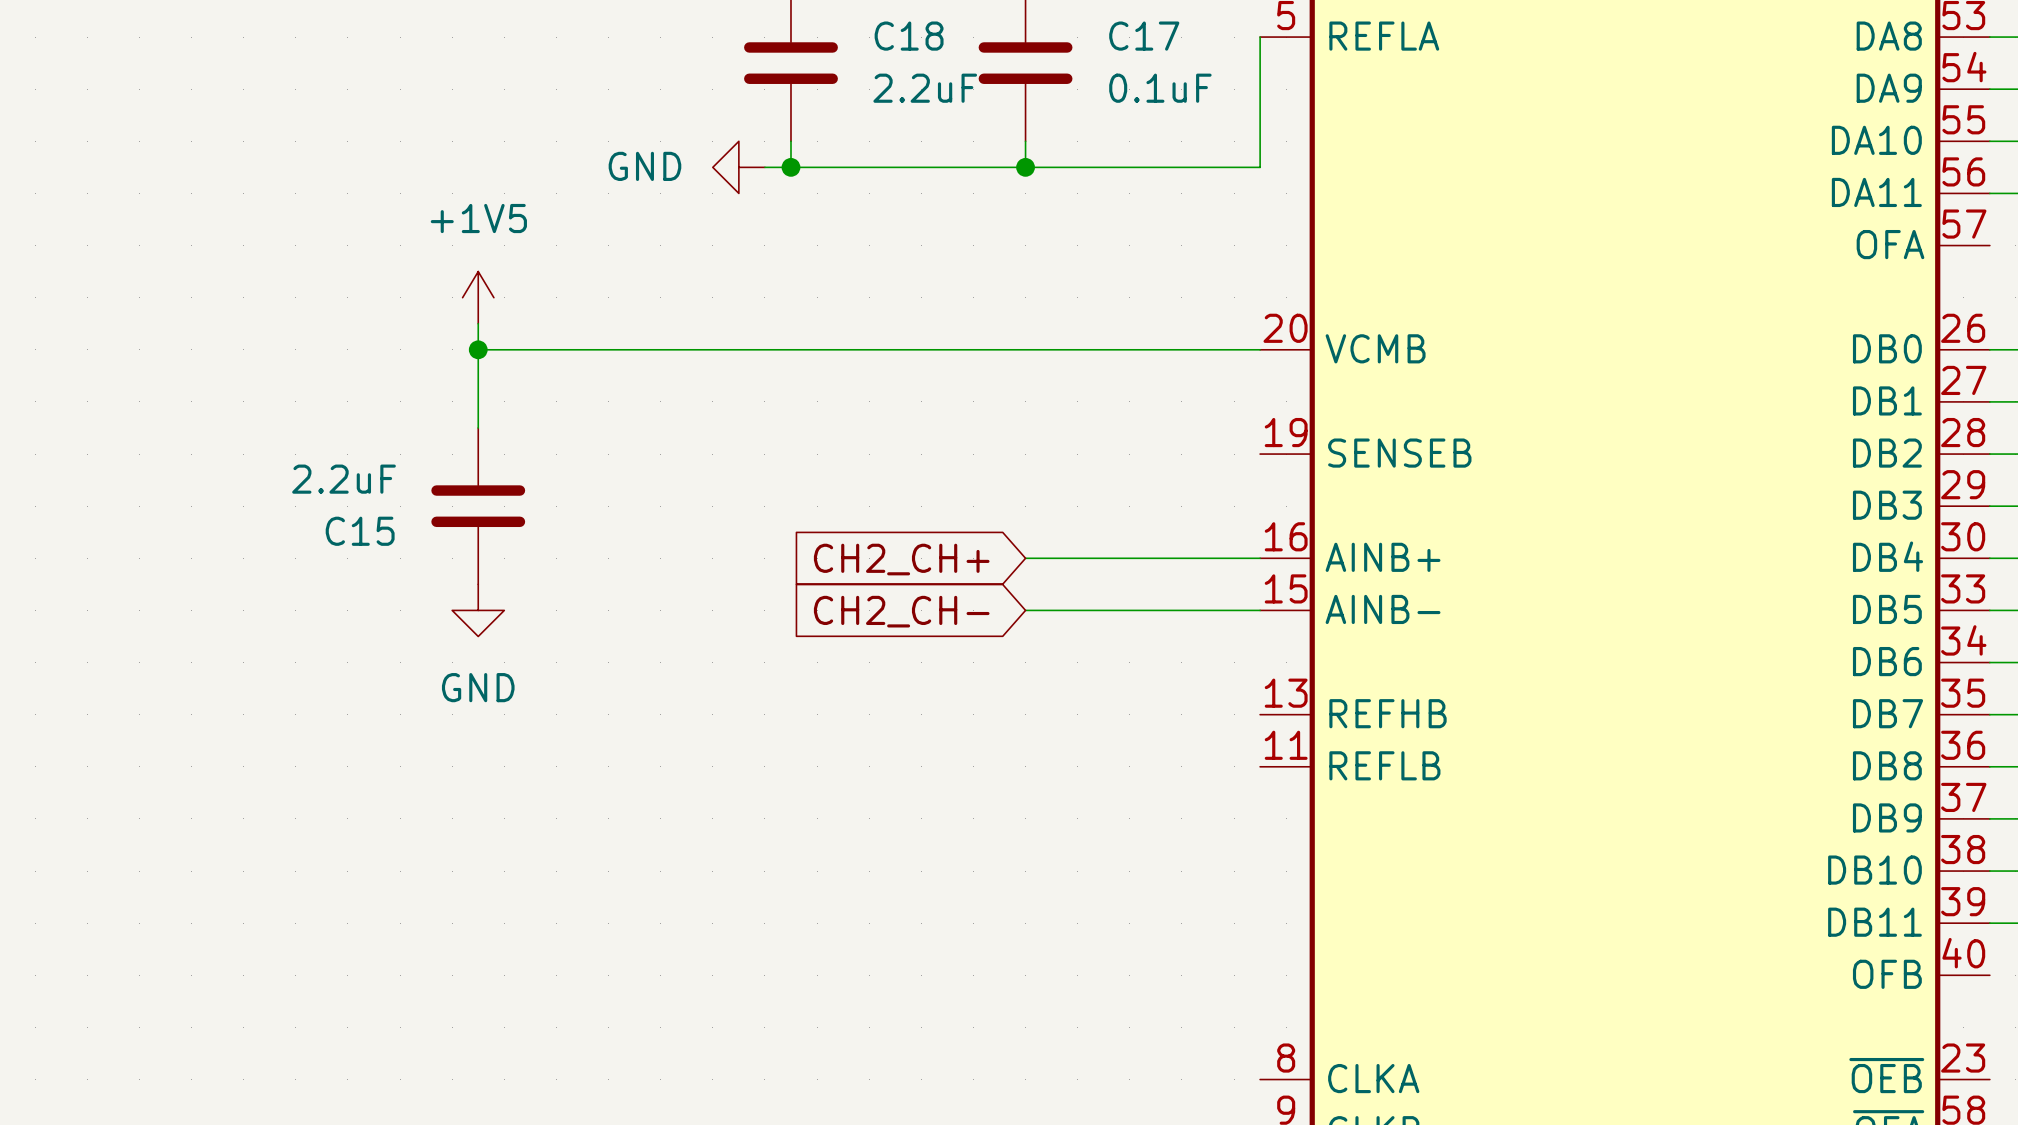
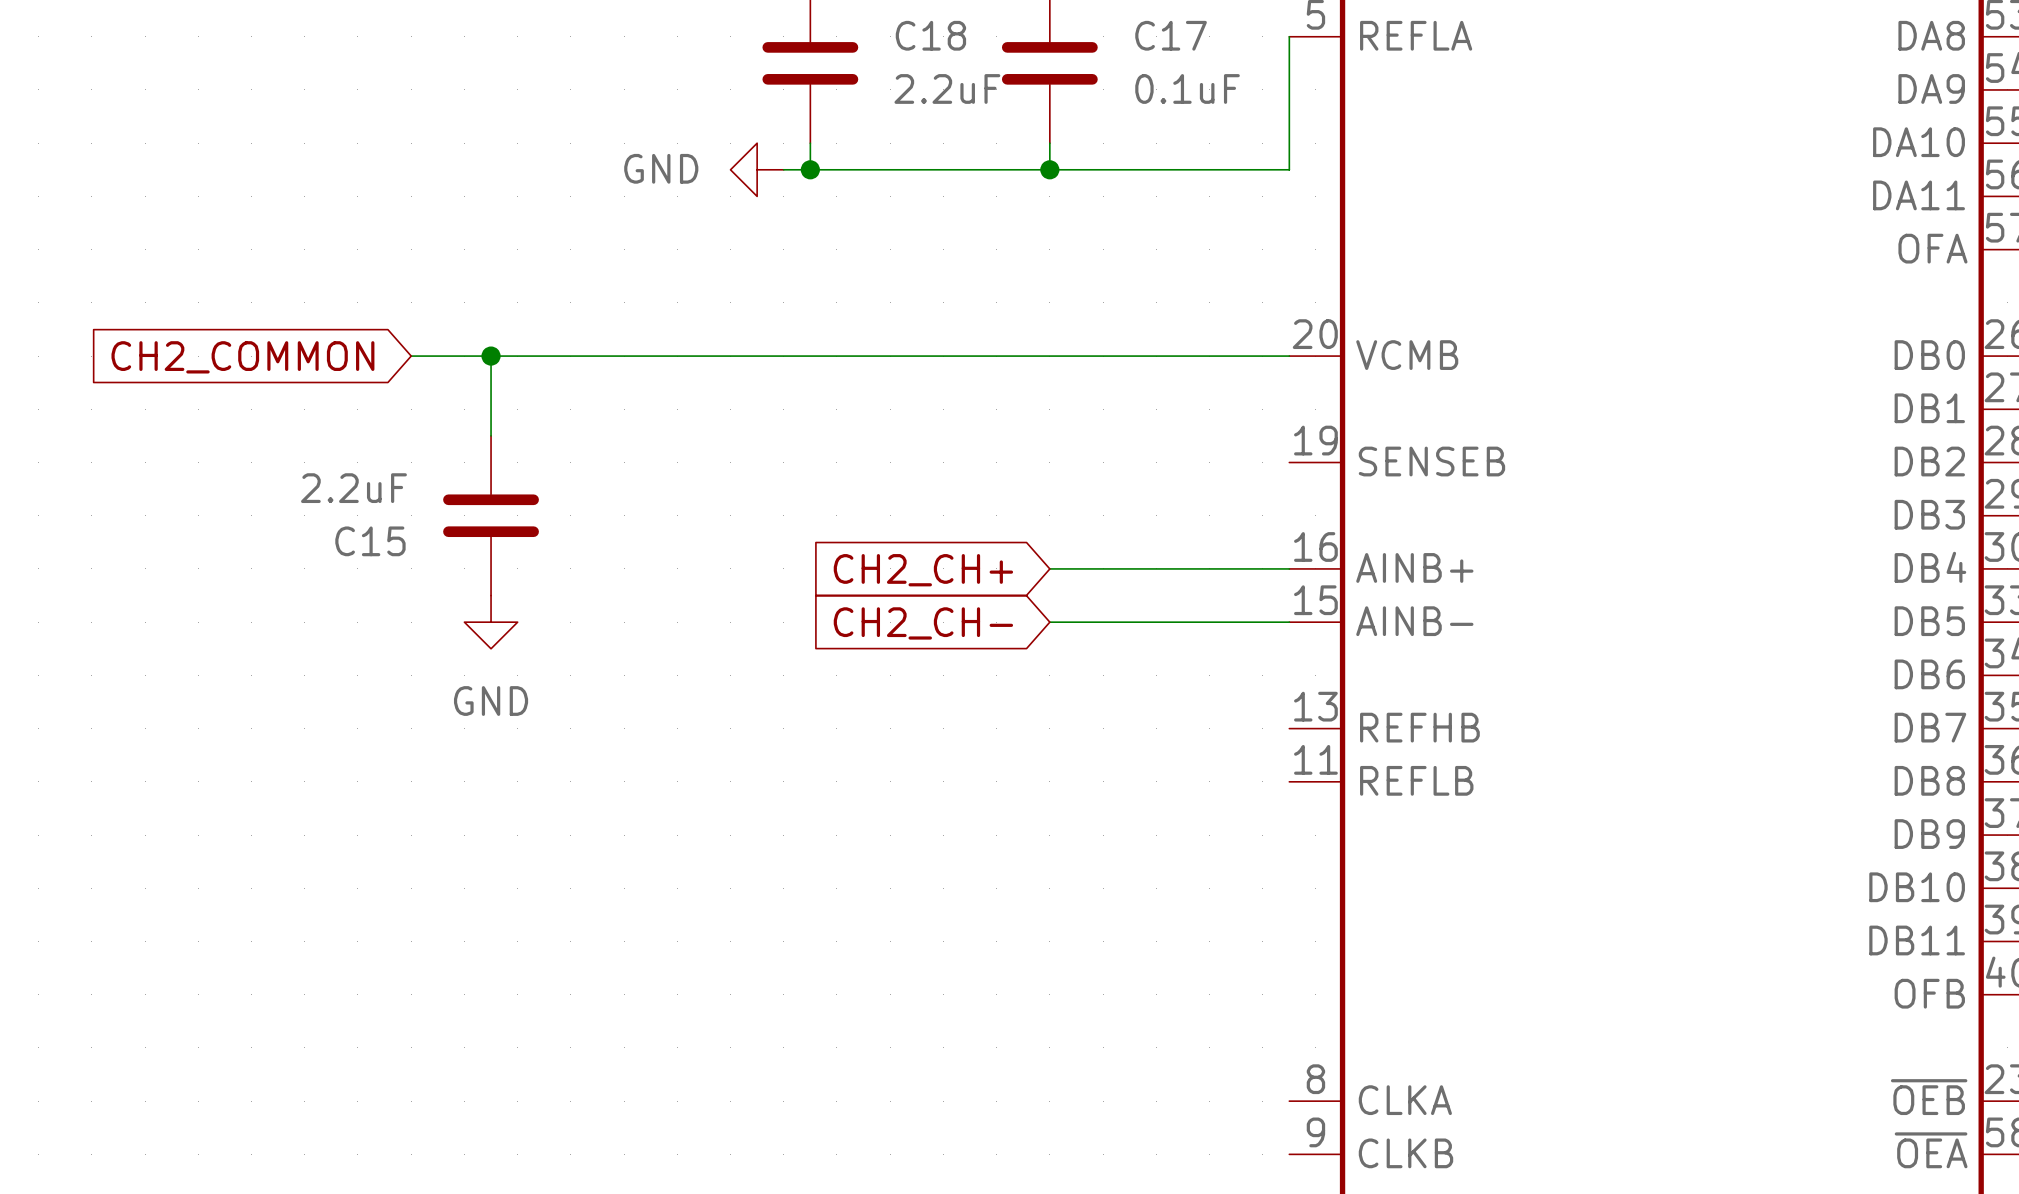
power symbol: +1V5 (478, 297) -> none
wire: (478, 323) (478, 349) -> (411, 356) (491, 356)
global label: none -> CH2_COMMON (242, 357)

